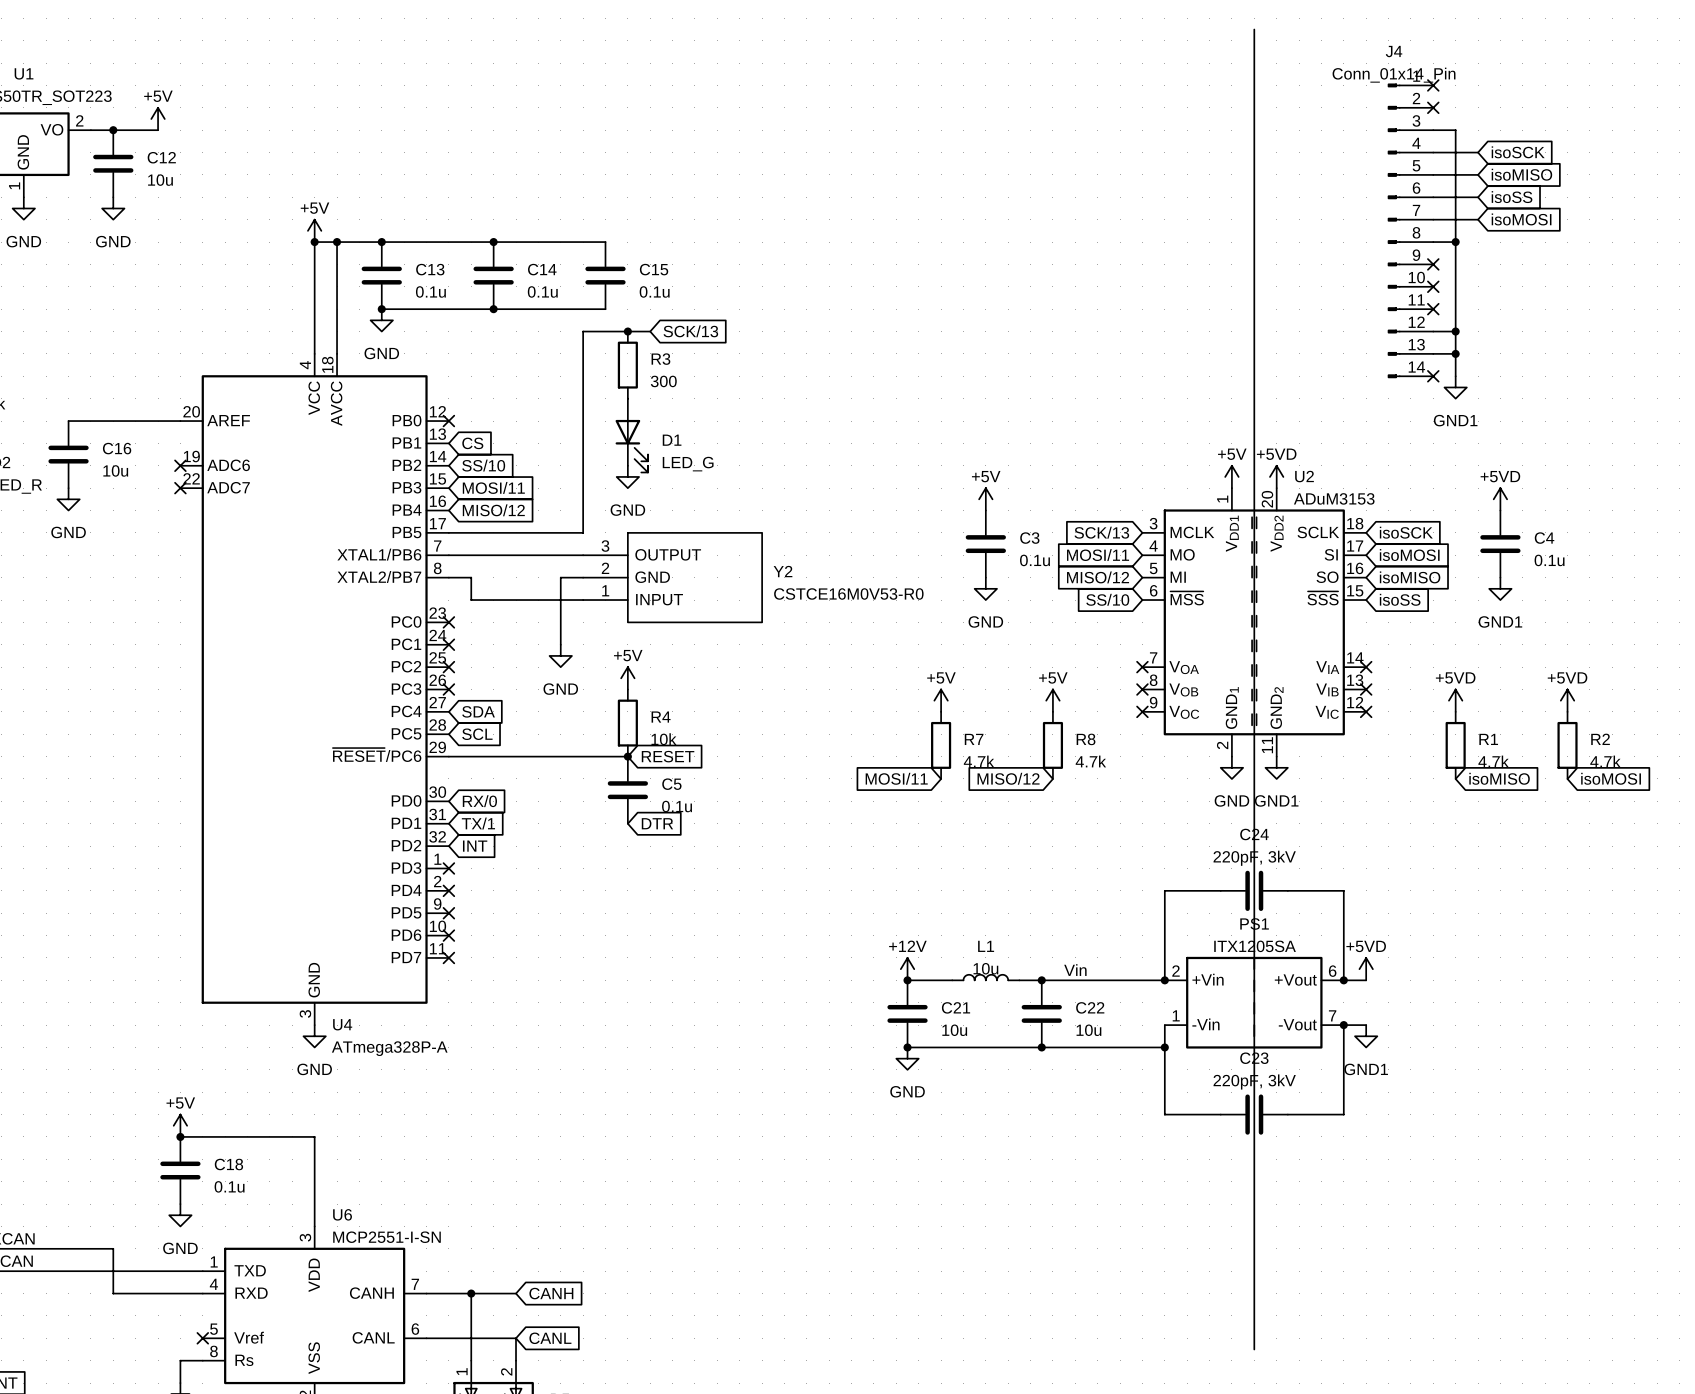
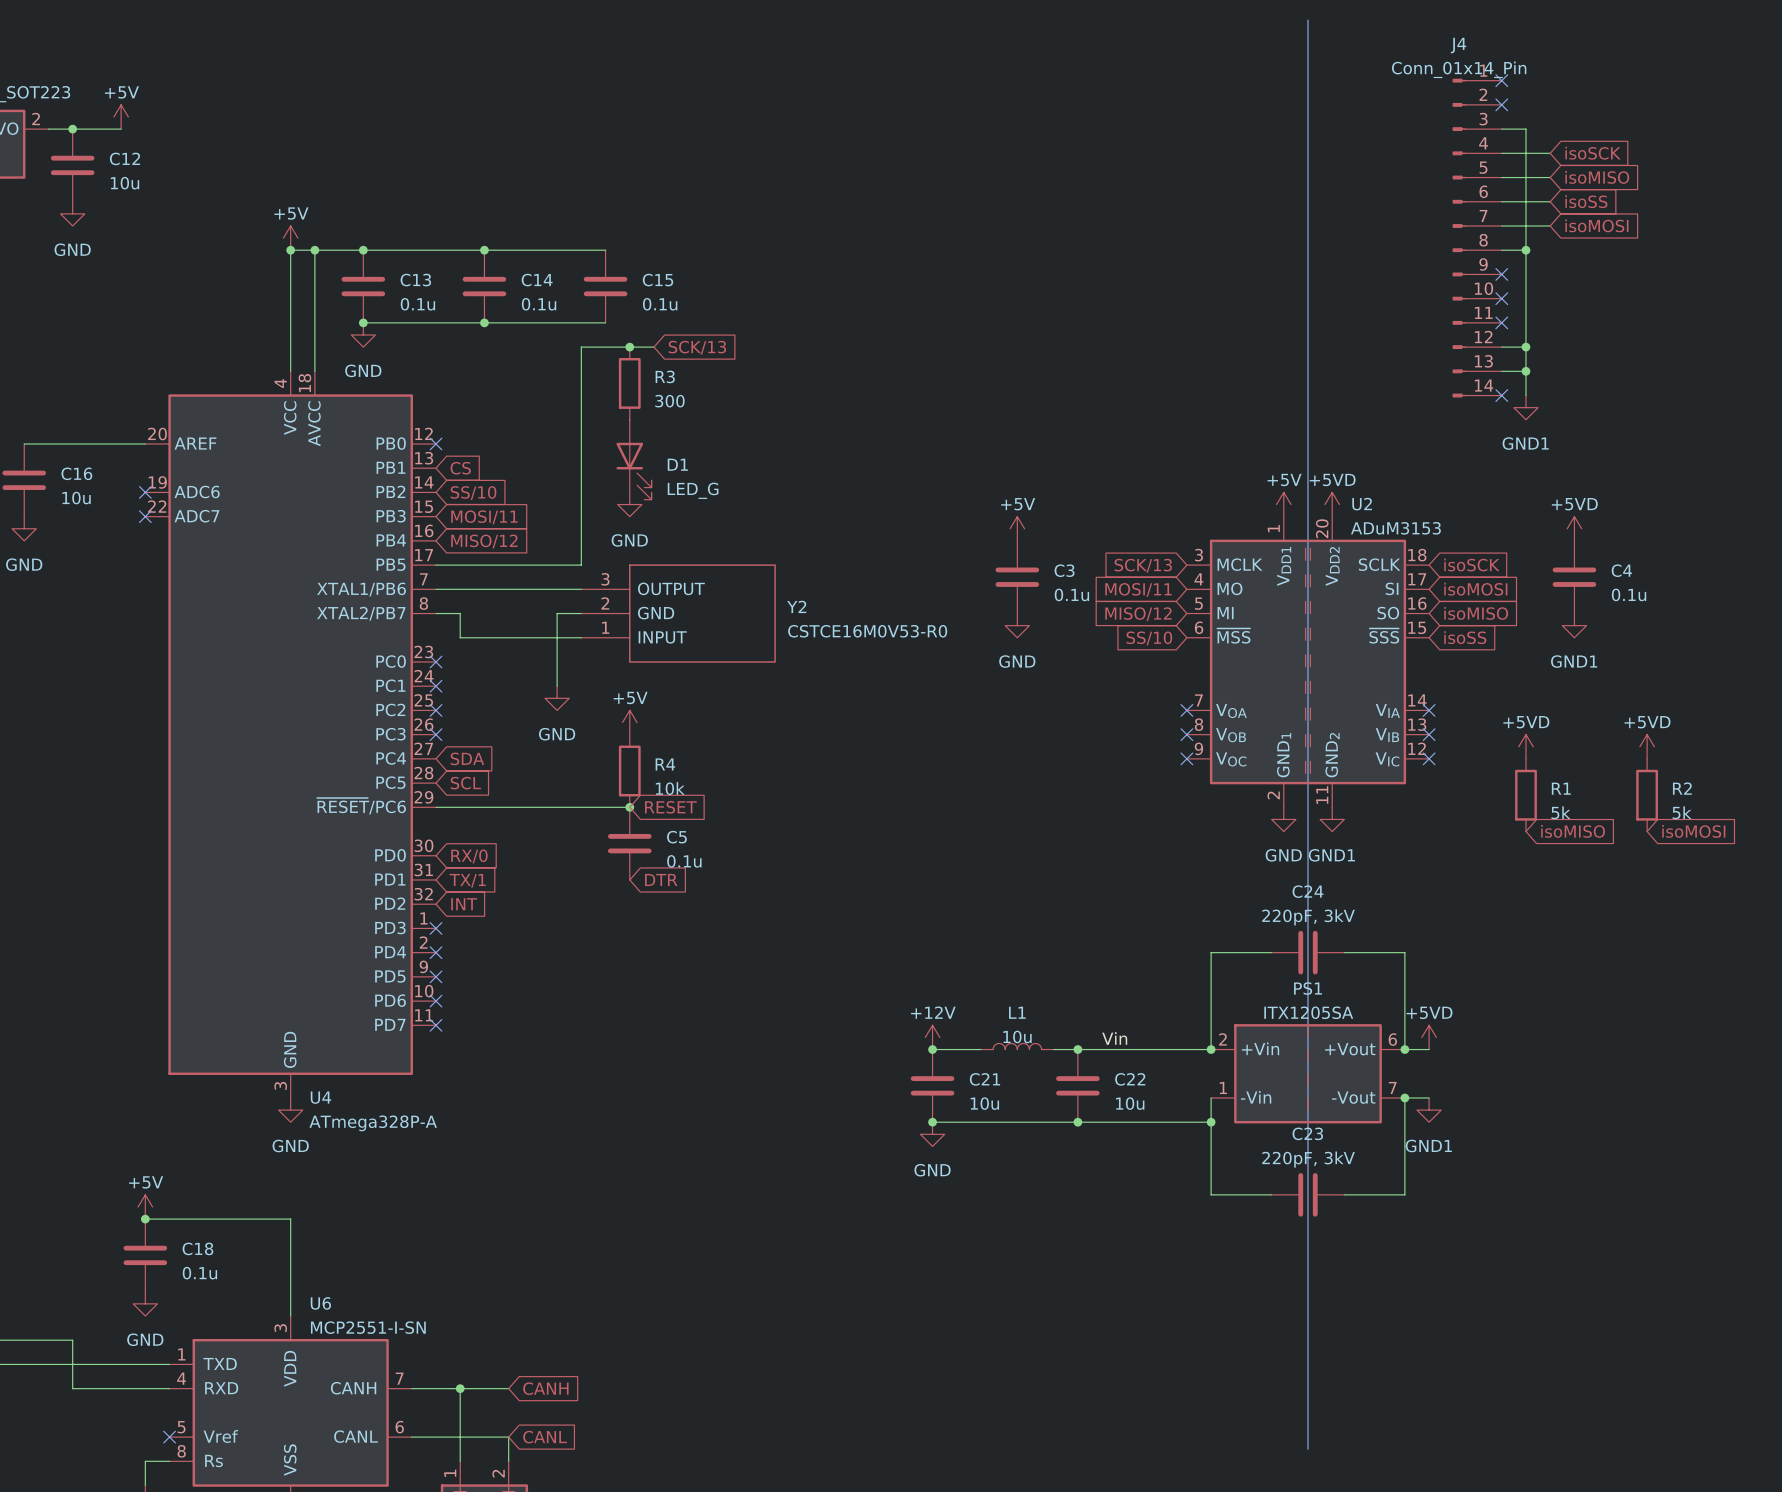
power symbol: +5V (941, 700) -> none
power symbol: +5V (1052, 700) -> none
R7: 4.7k (941, 745) -> none
R8: 4.7k (1052, 745) -> none
R1 value: 4.7k (1493, 761) -> 5k (1560, 812)
R2 value: 4.7k (1605, 761) -> 5k (1682, 812)
global label: MOSI/11 (896, 778) -> none
global label: MISO/12 (1008, 778) -> none

